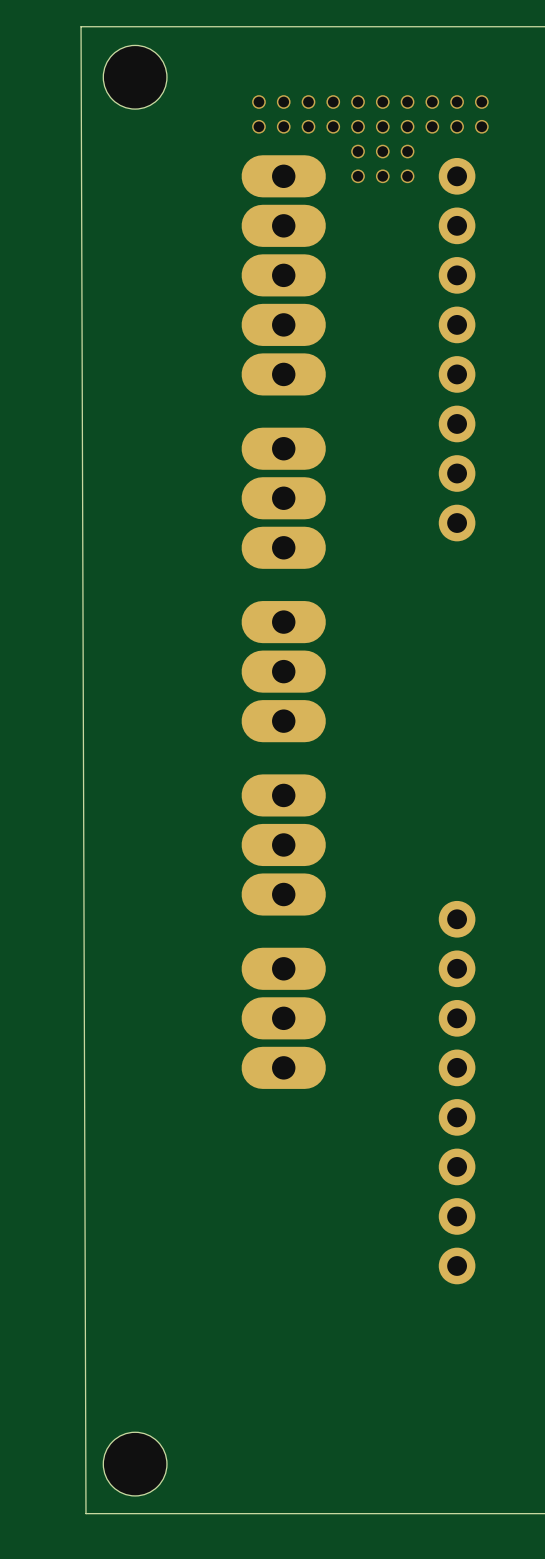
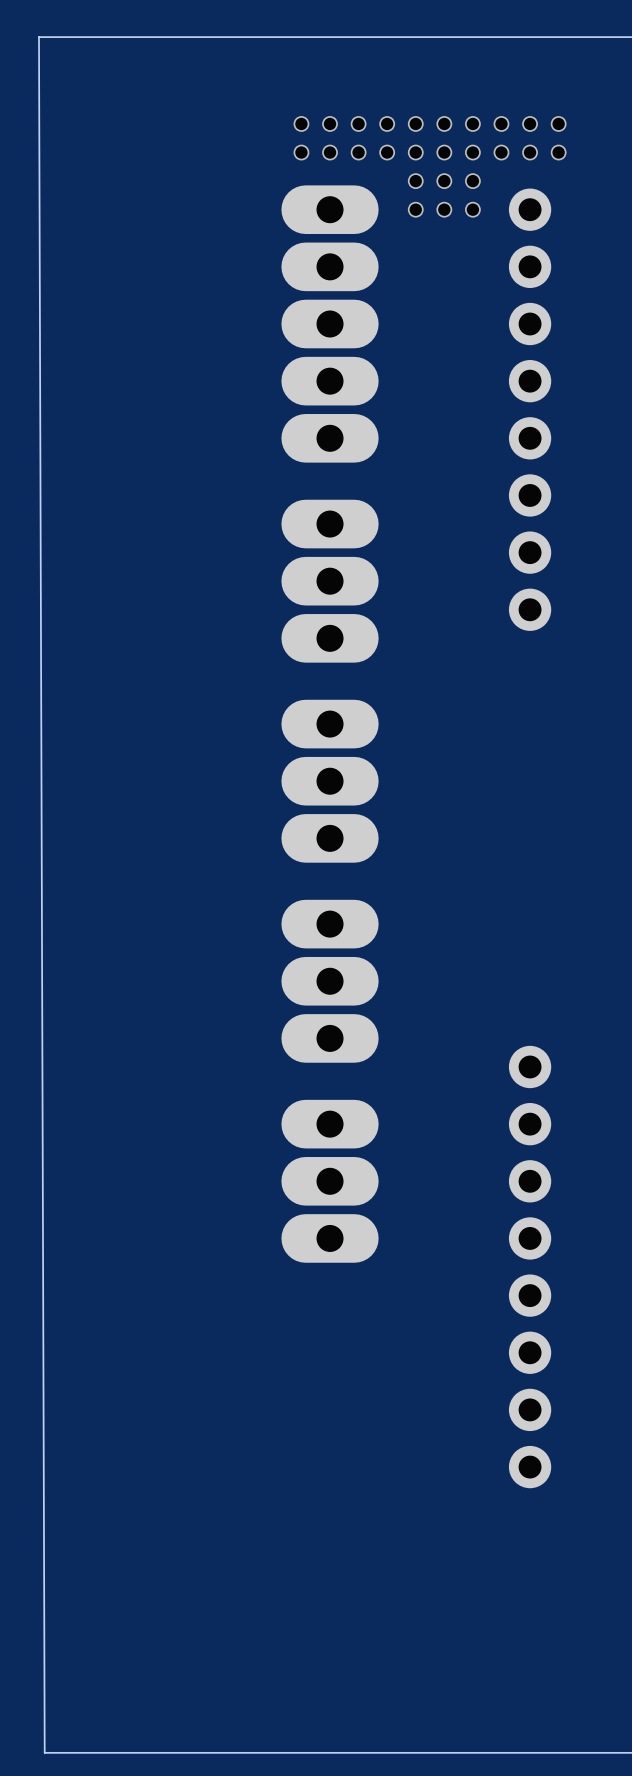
board edge: (81, 26) (85, 1513) -> (96, 37) (38, 37) (44, 1752) (101, 1752)
hole: (135, 77) -> none
hole: (135, 1464) -> none

